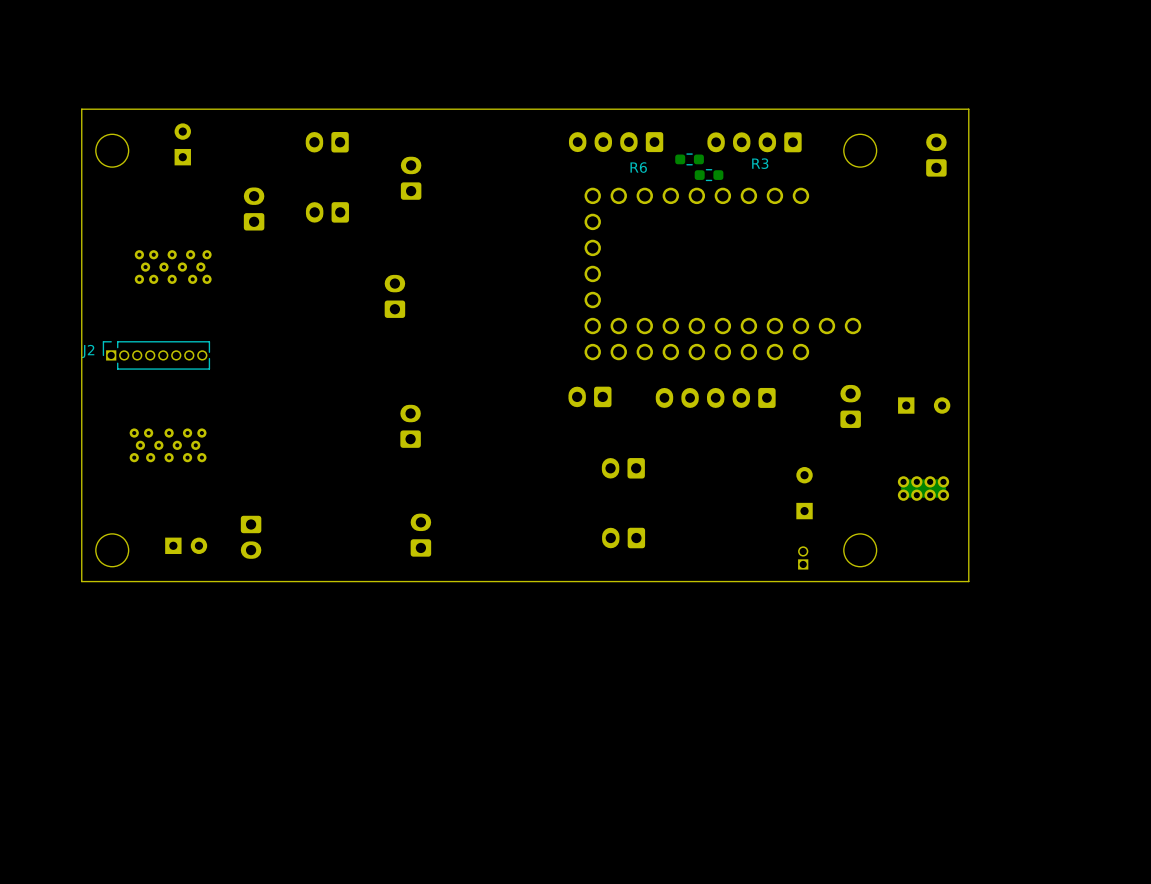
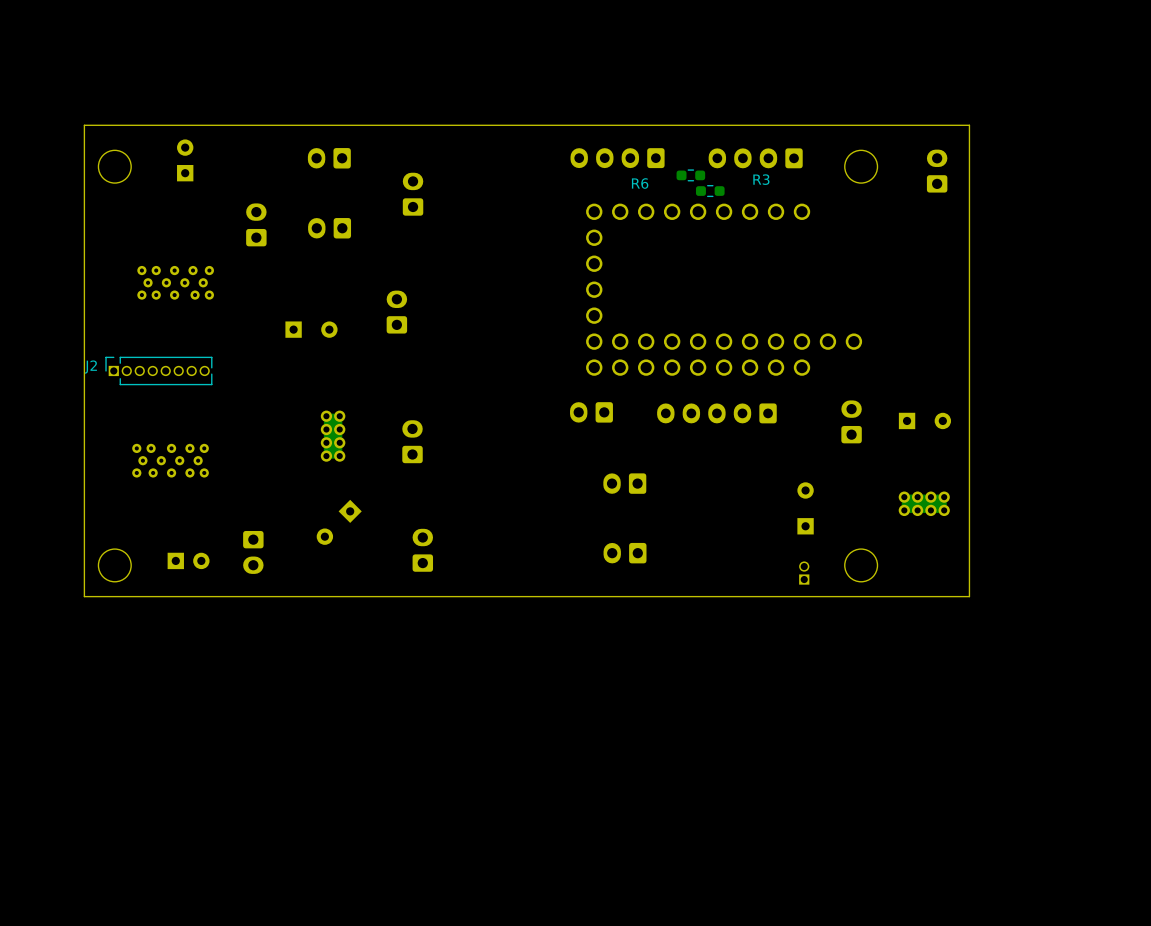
part: none -> (311, 329)
part: none -> (333, 436)
part: none -> (339, 522)

